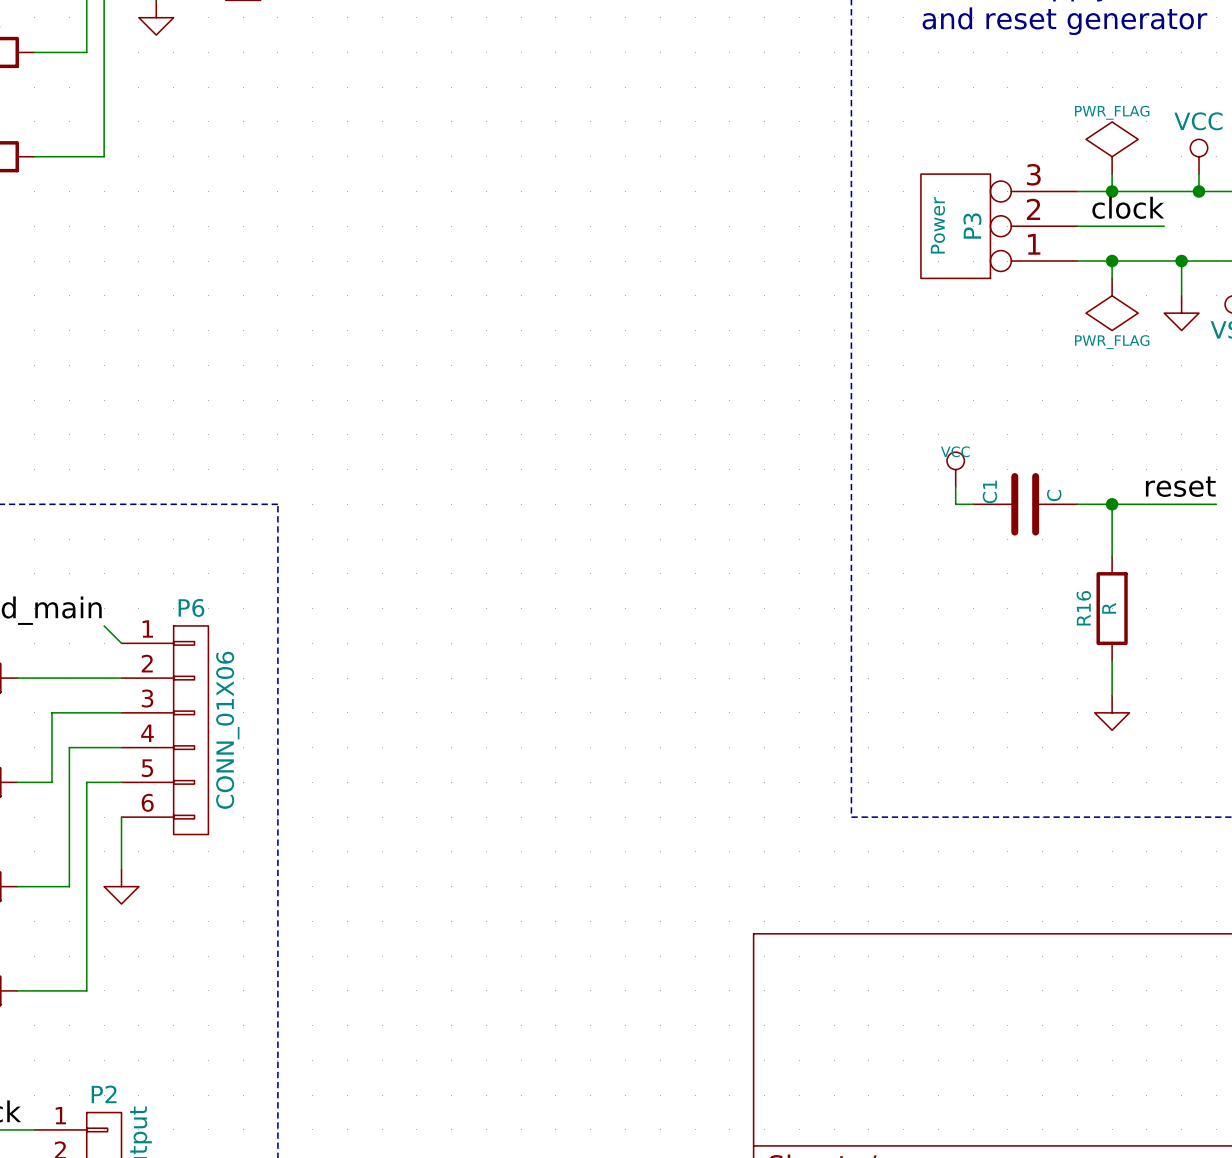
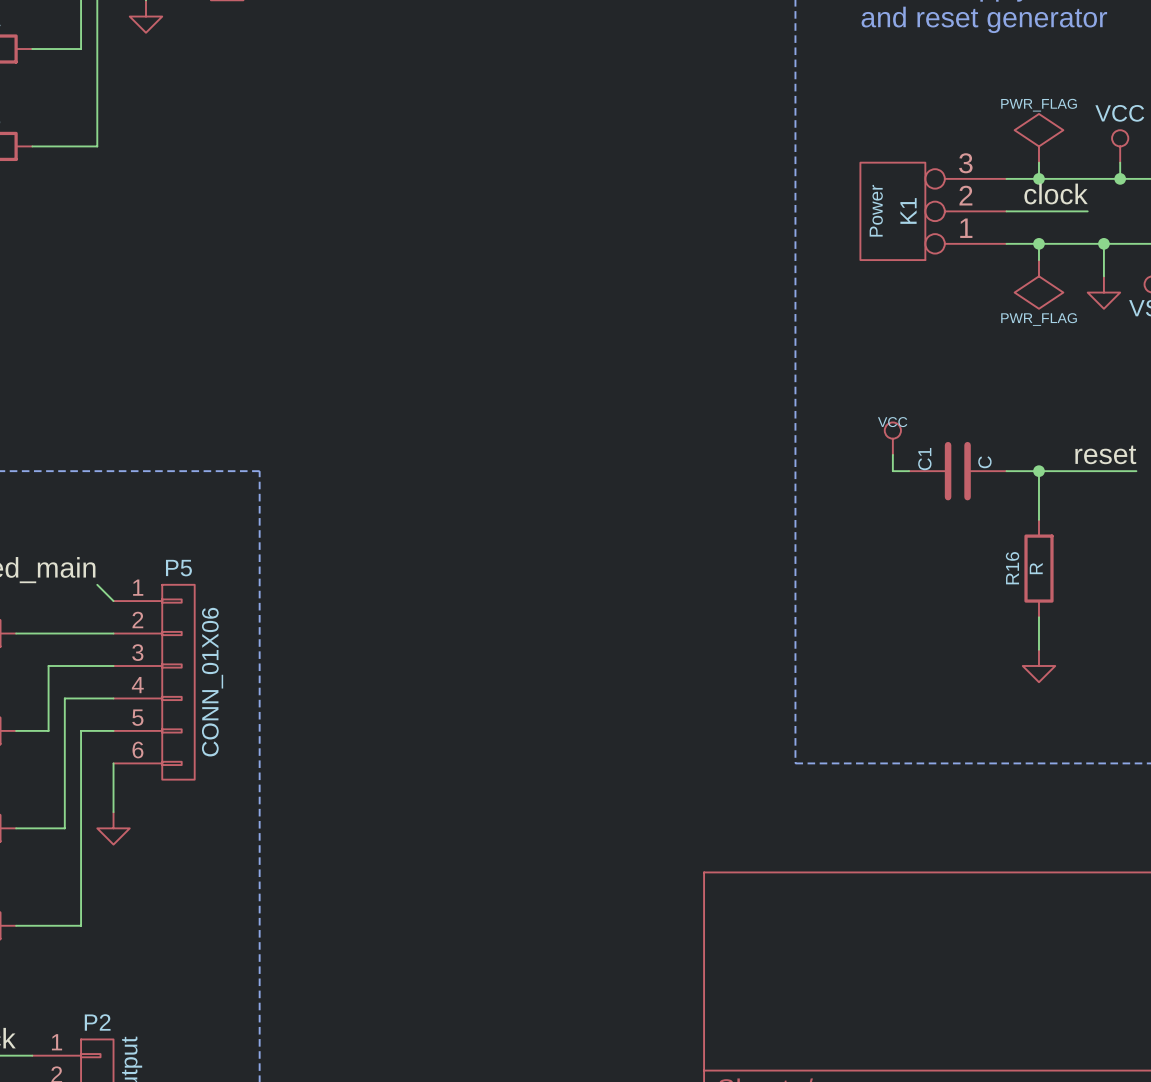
P3 name: P3 (972, 226) -> K1 (908, 210)
P6 name: P6 (191, 607) -> P5 (178, 568)

